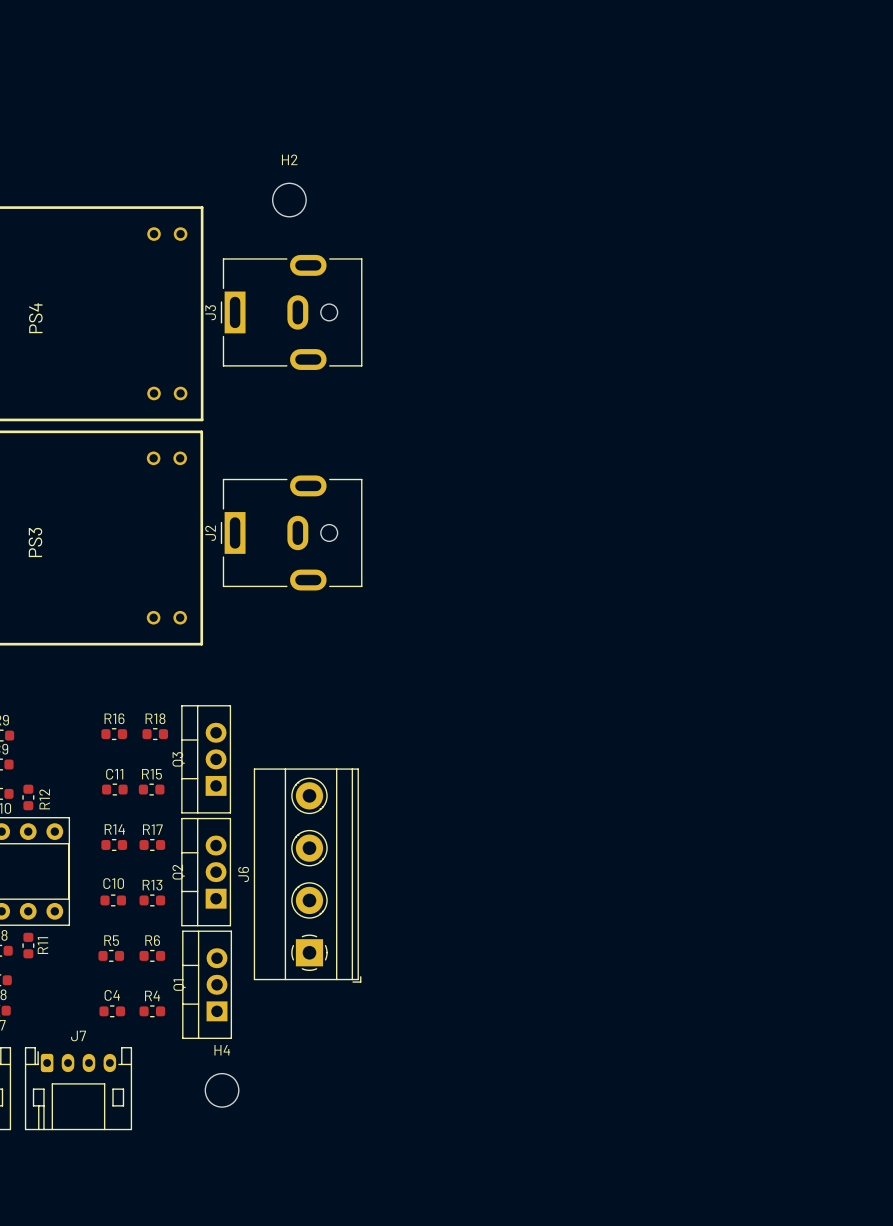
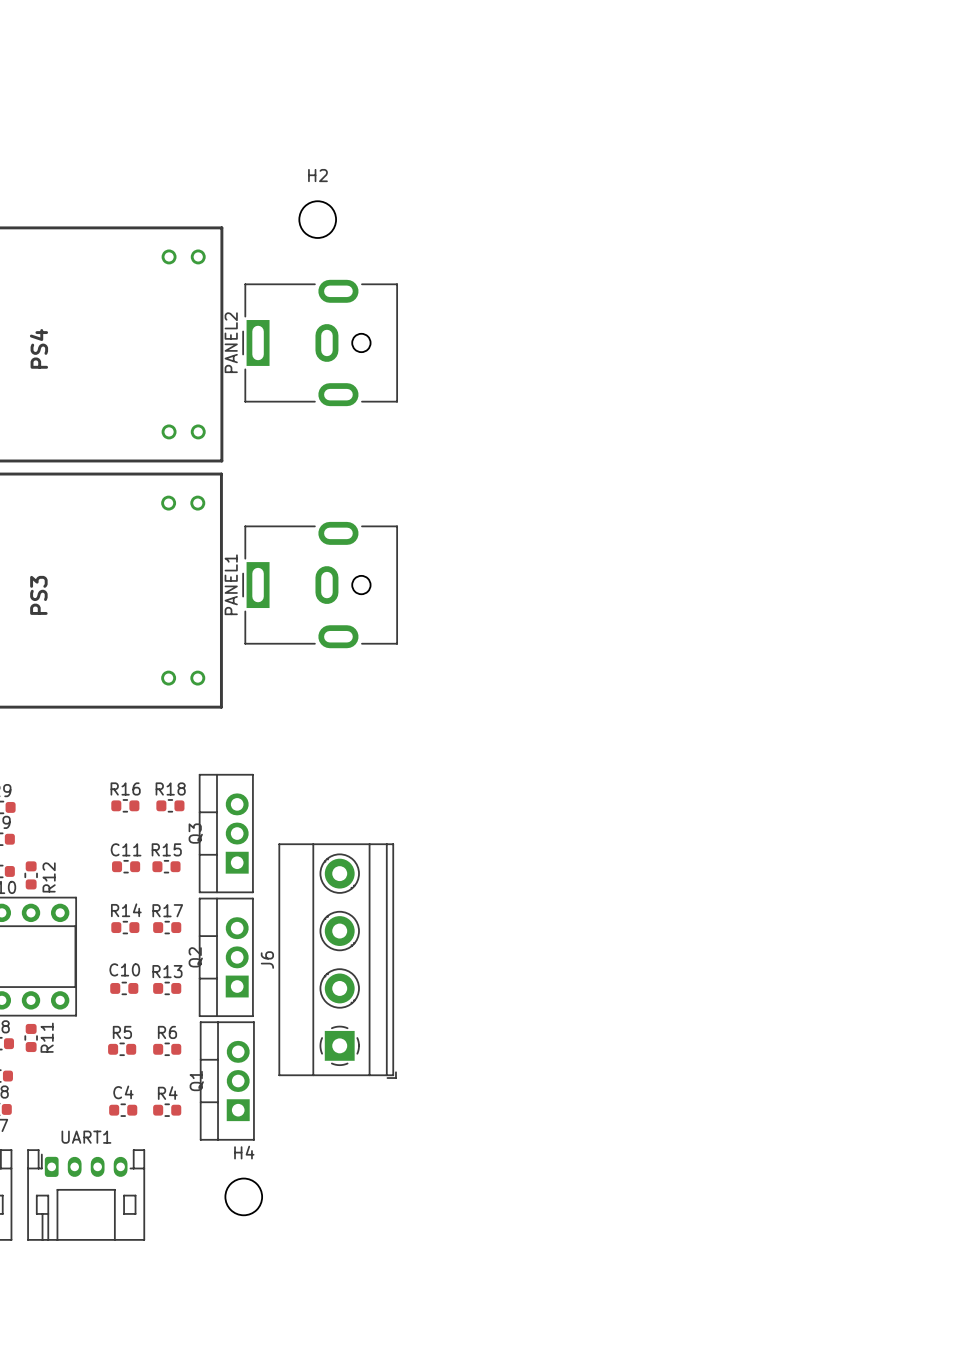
J3 name: J3 (210, 312) -> PANEL2 (231, 342)
J2 name: J2 (210, 533) -> PANEL1 (231, 584)
J7 name: J7 (78, 1035) -> UART1 (86, 1137)

